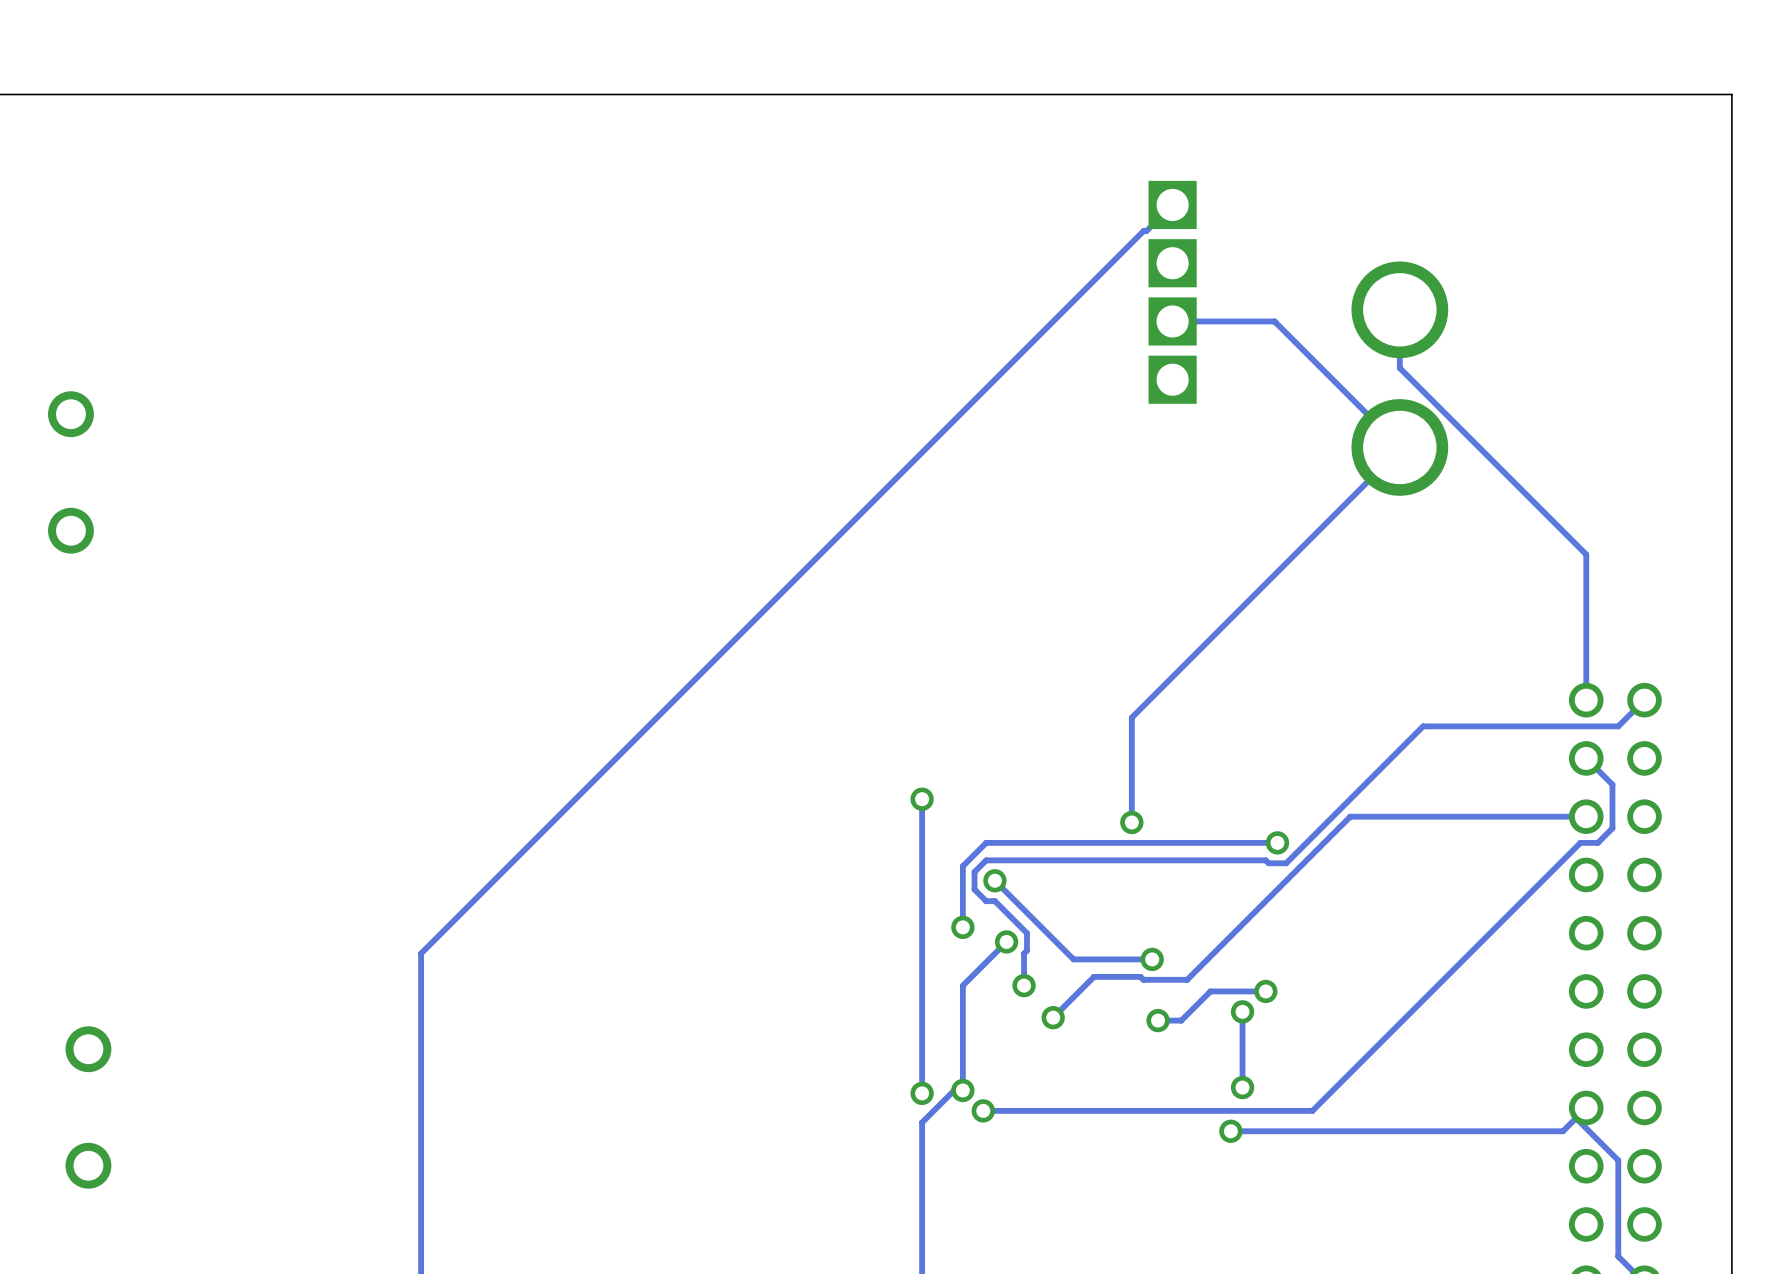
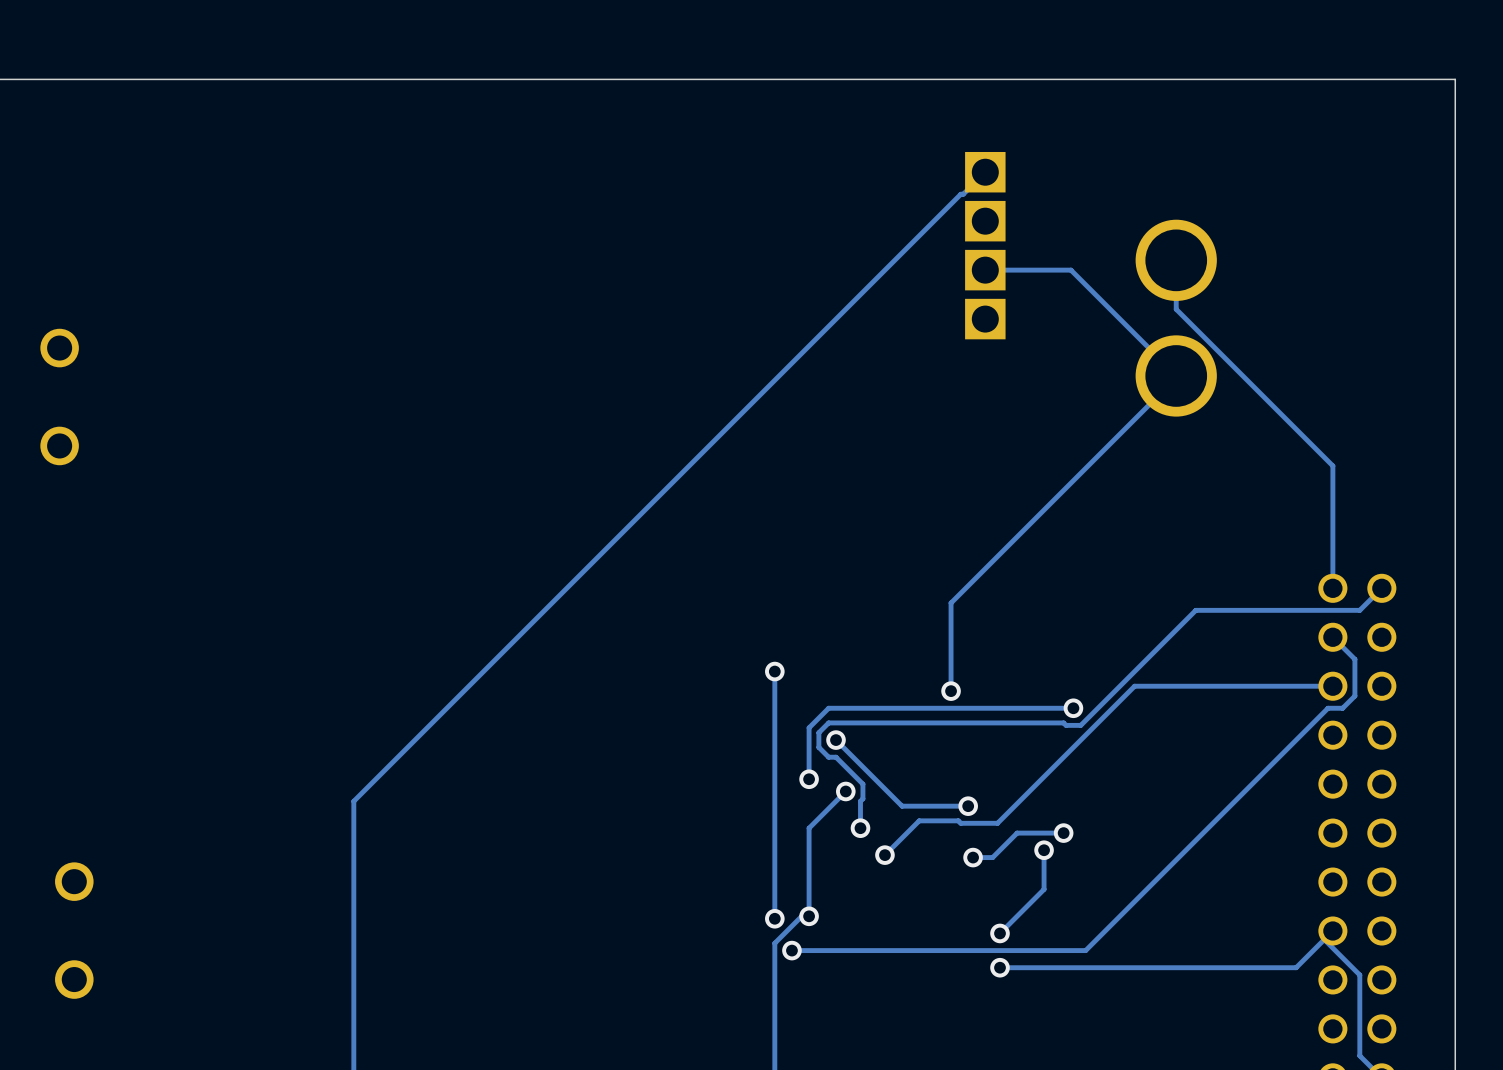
track: (1242, 1058) (1242, 1087) -> (1044, 889) (1000, 933)
via: (1242, 1087) -> none
via position: (983, 1110) -> (791, 950)
via: none -> (1000, 933)
track: (1312, 1110) (983, 1110) -> (1102, 933) (1085, 950)
track: none -> (1034, 950) (791, 950)
via: (1230, 1131) -> none
track: (1562, 1131) (1292, 1131) -> (1313, 950) (1296, 967) (1000, 967)
via: none -> (1000, 967)

